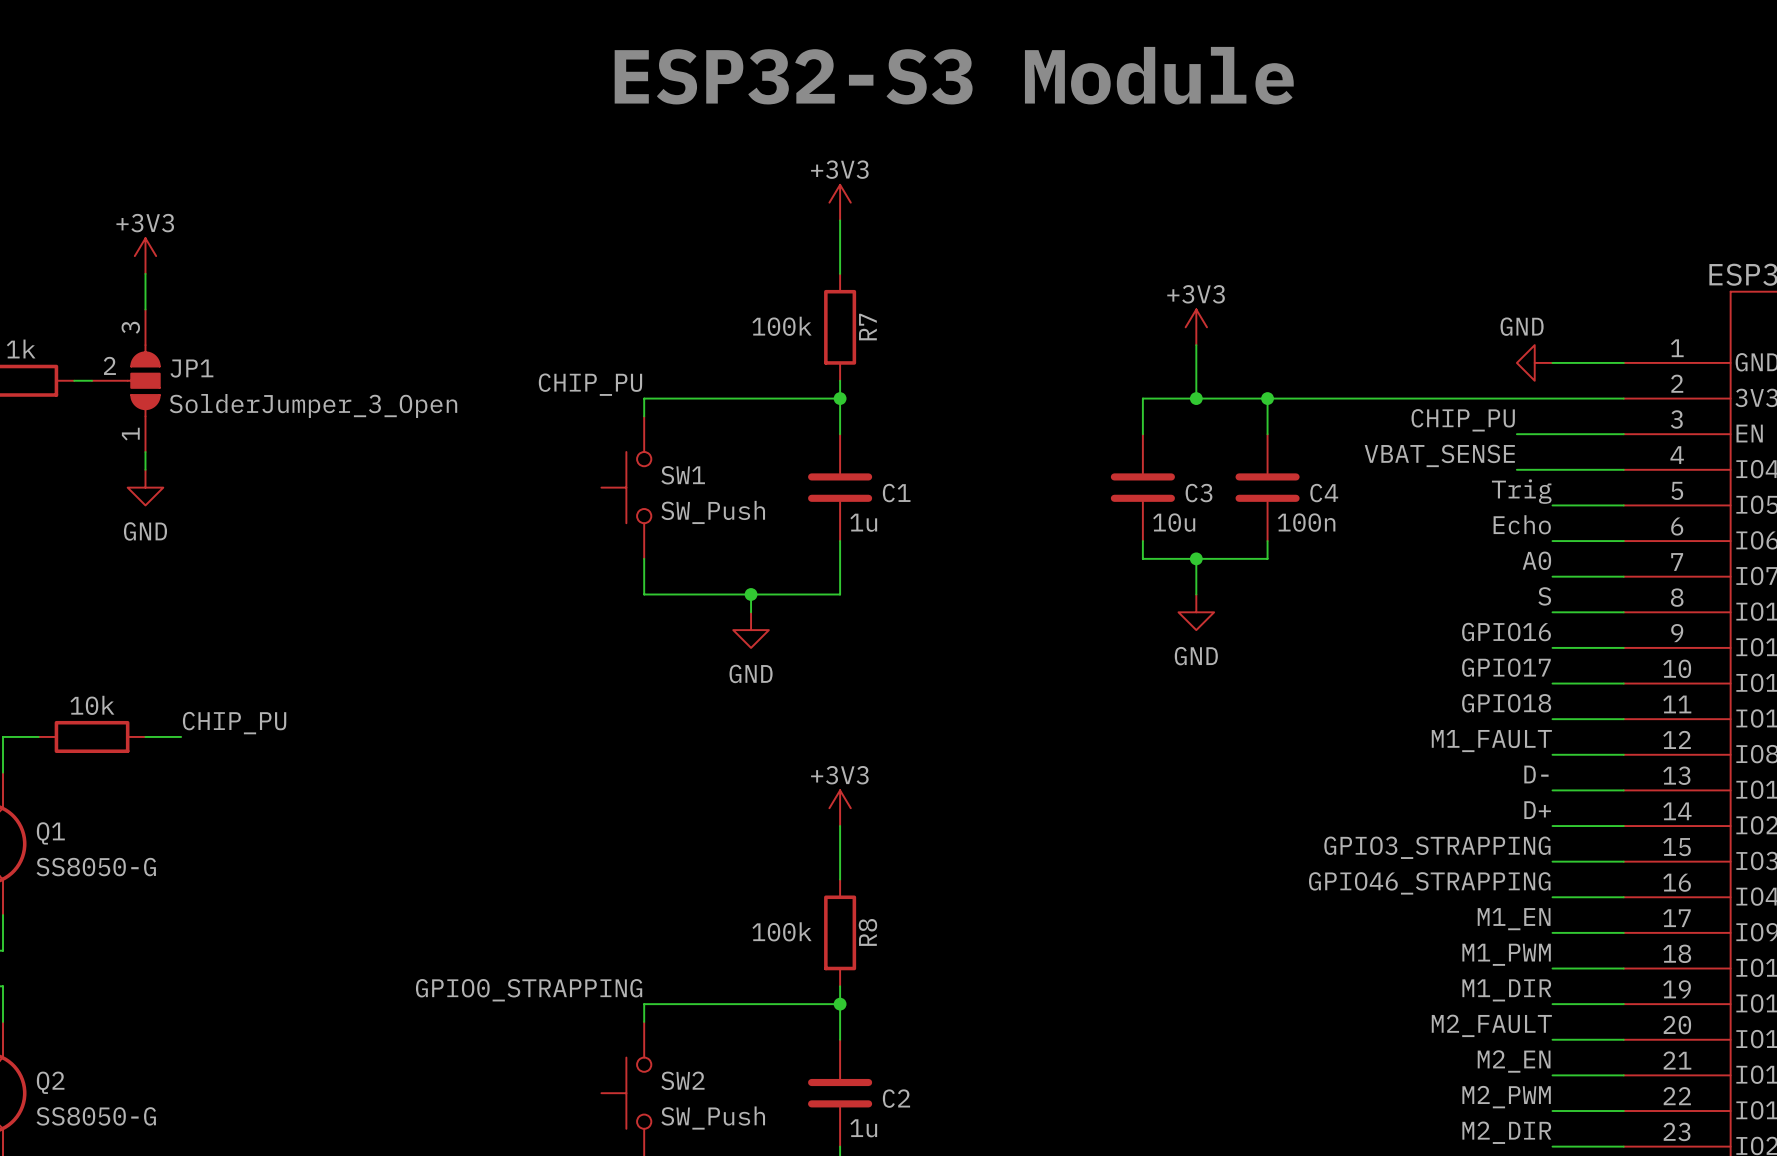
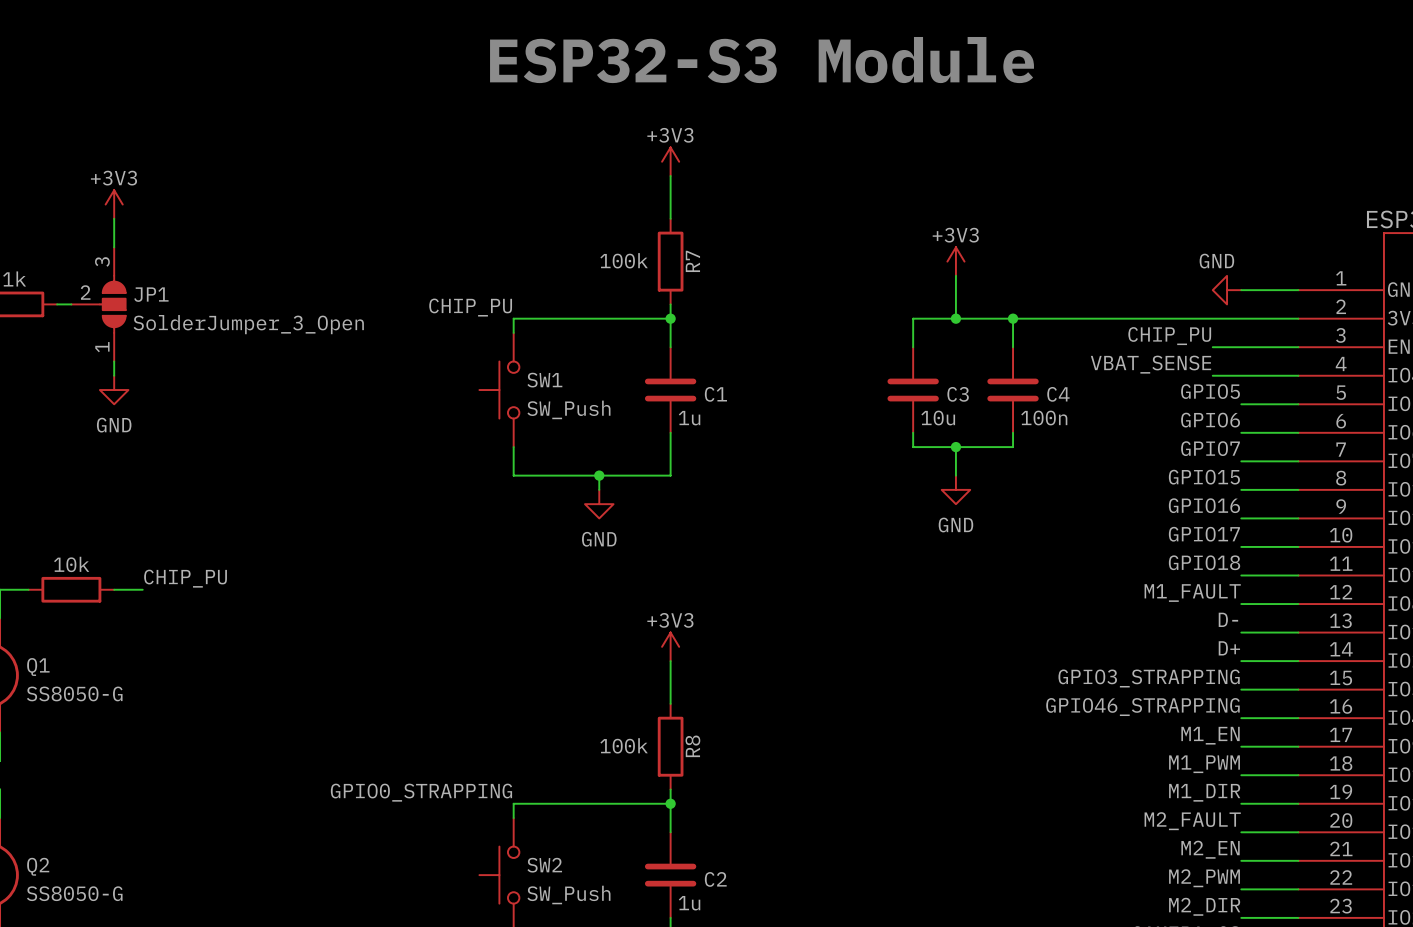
label: Trig (1521, 491) -> GPIO5 (1210, 391)
label: Echo (1522, 524) -> GPIO6 (1210, 420)
label: A0 (1536, 560) -> GPIO7 (1210, 448)
label: S (1544, 596) -> GPIO15 (1204, 477)

